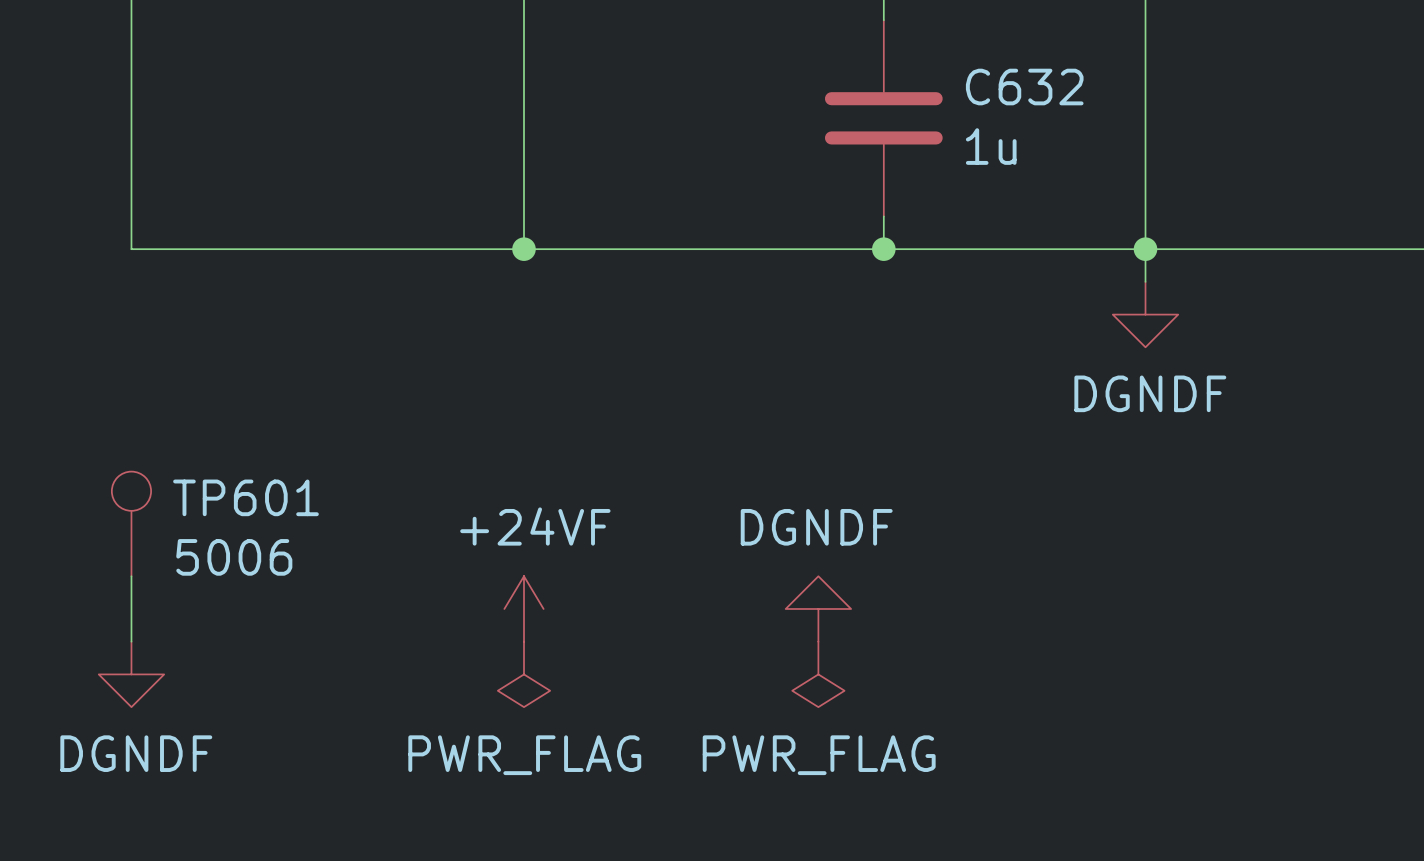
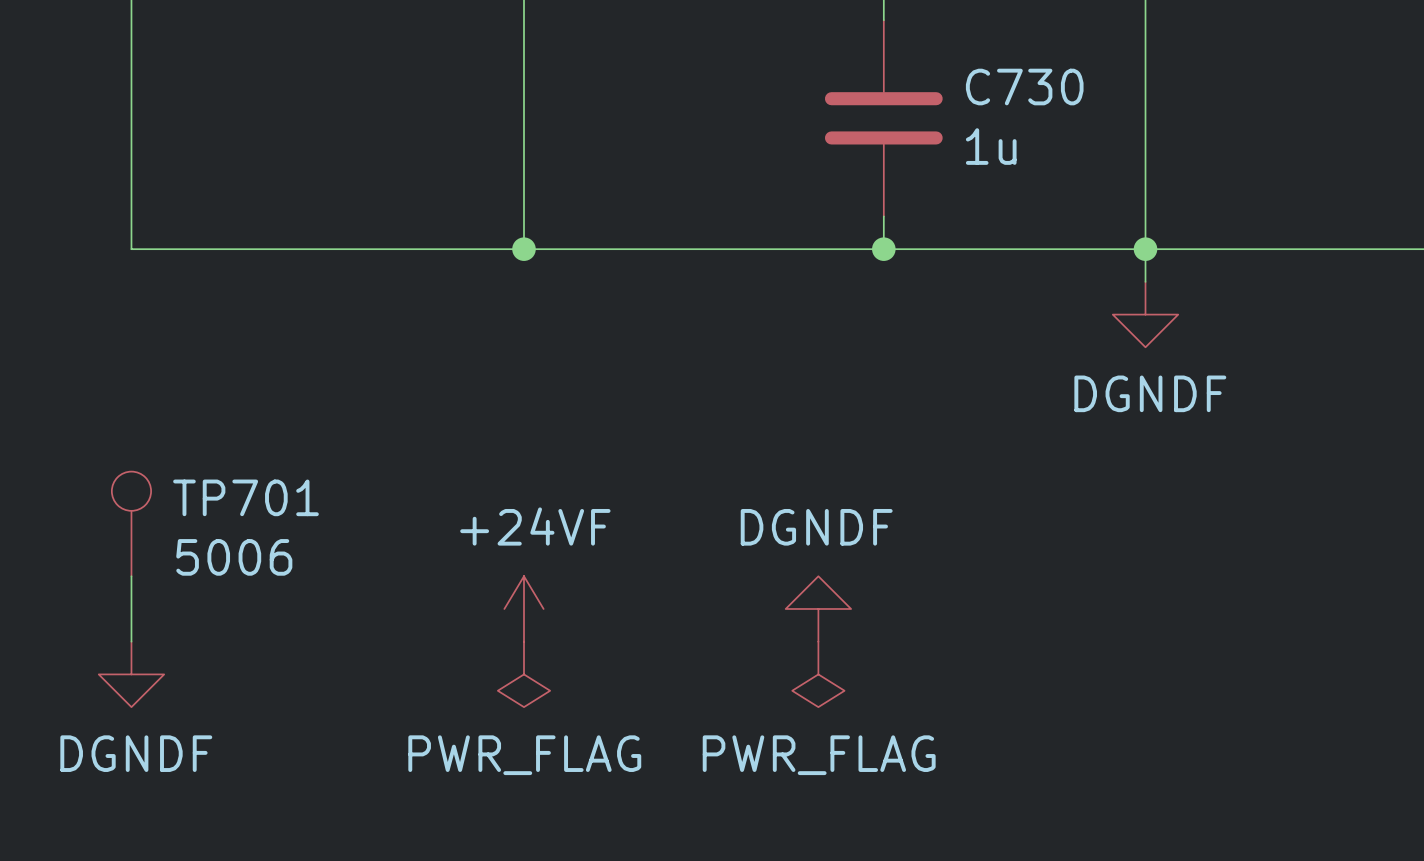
C632 name: C632 (1024, 87) -> C730 (1024, 87)
TP601 name: TP601 (245, 497) -> TP701 (245, 497)

